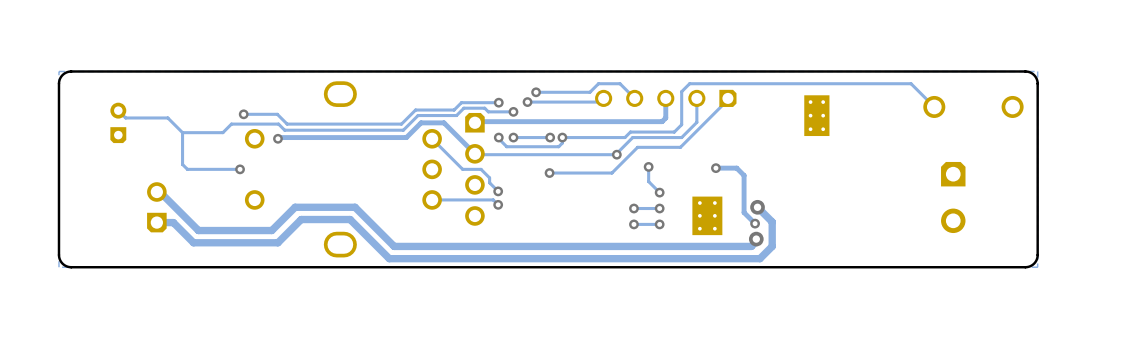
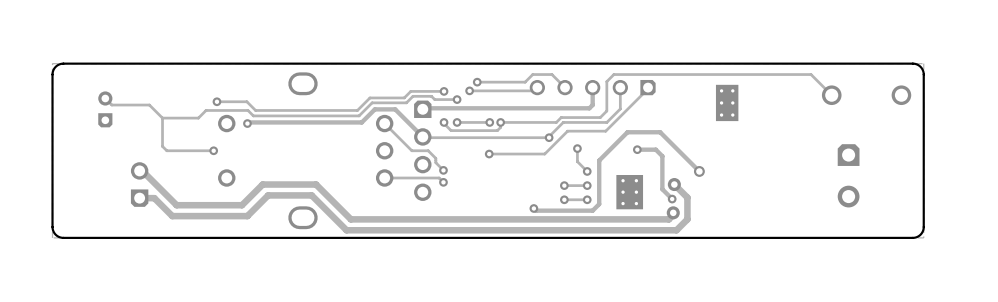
track: none -> (699, 171) (660, 132) (627, 132) (599, 160) (599, 204) (592, 210) (536, 210) (533, 208)
via: none -> (699, 171)
via: none -> (533, 208)

